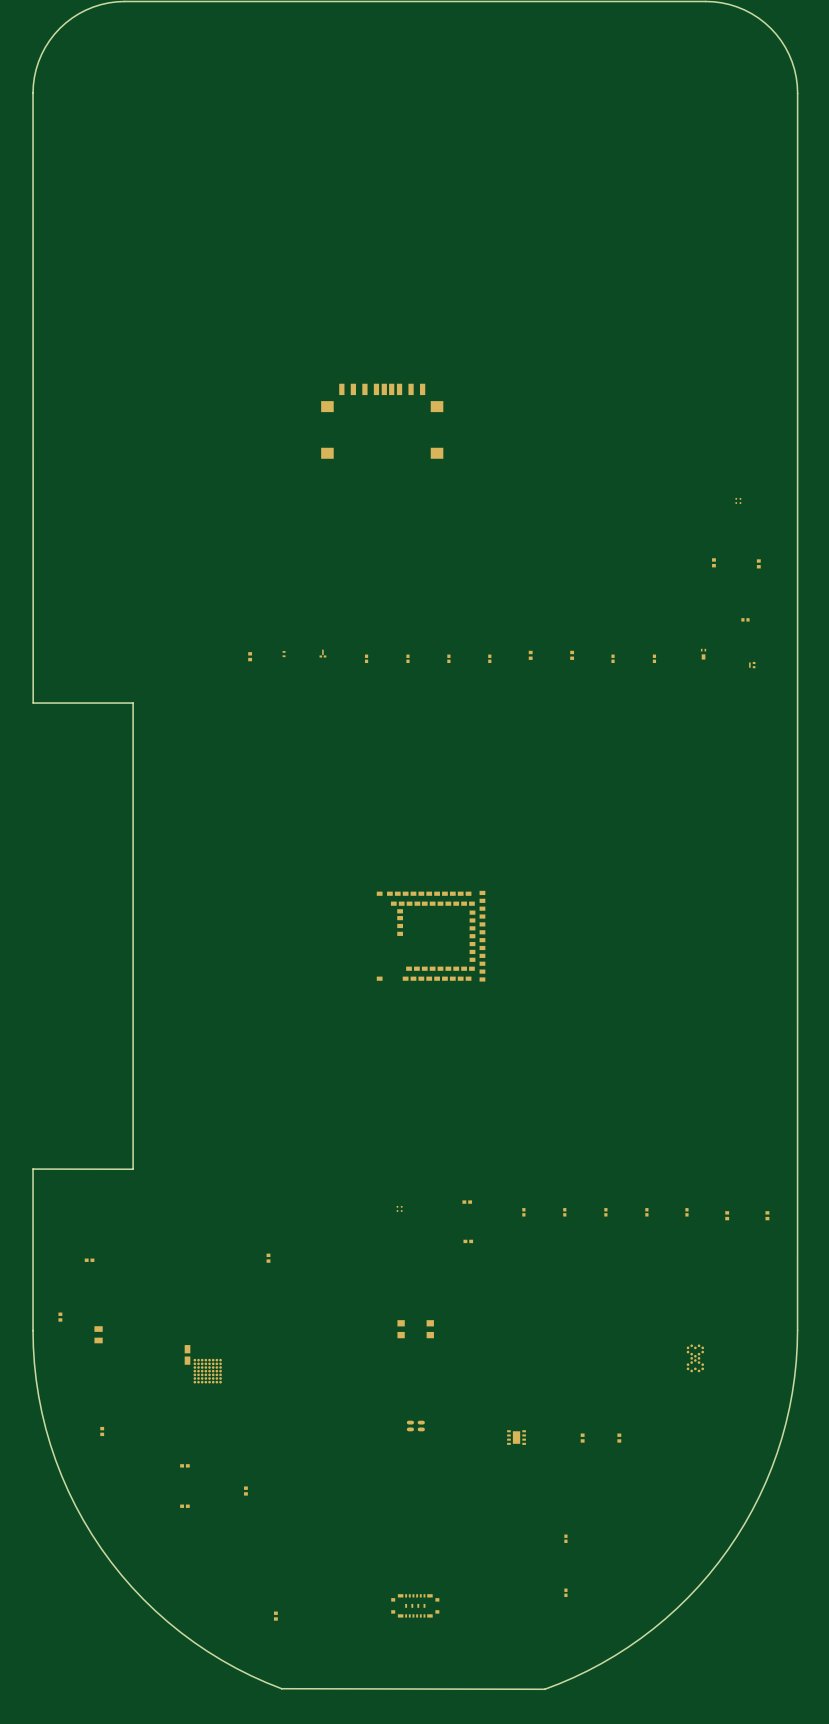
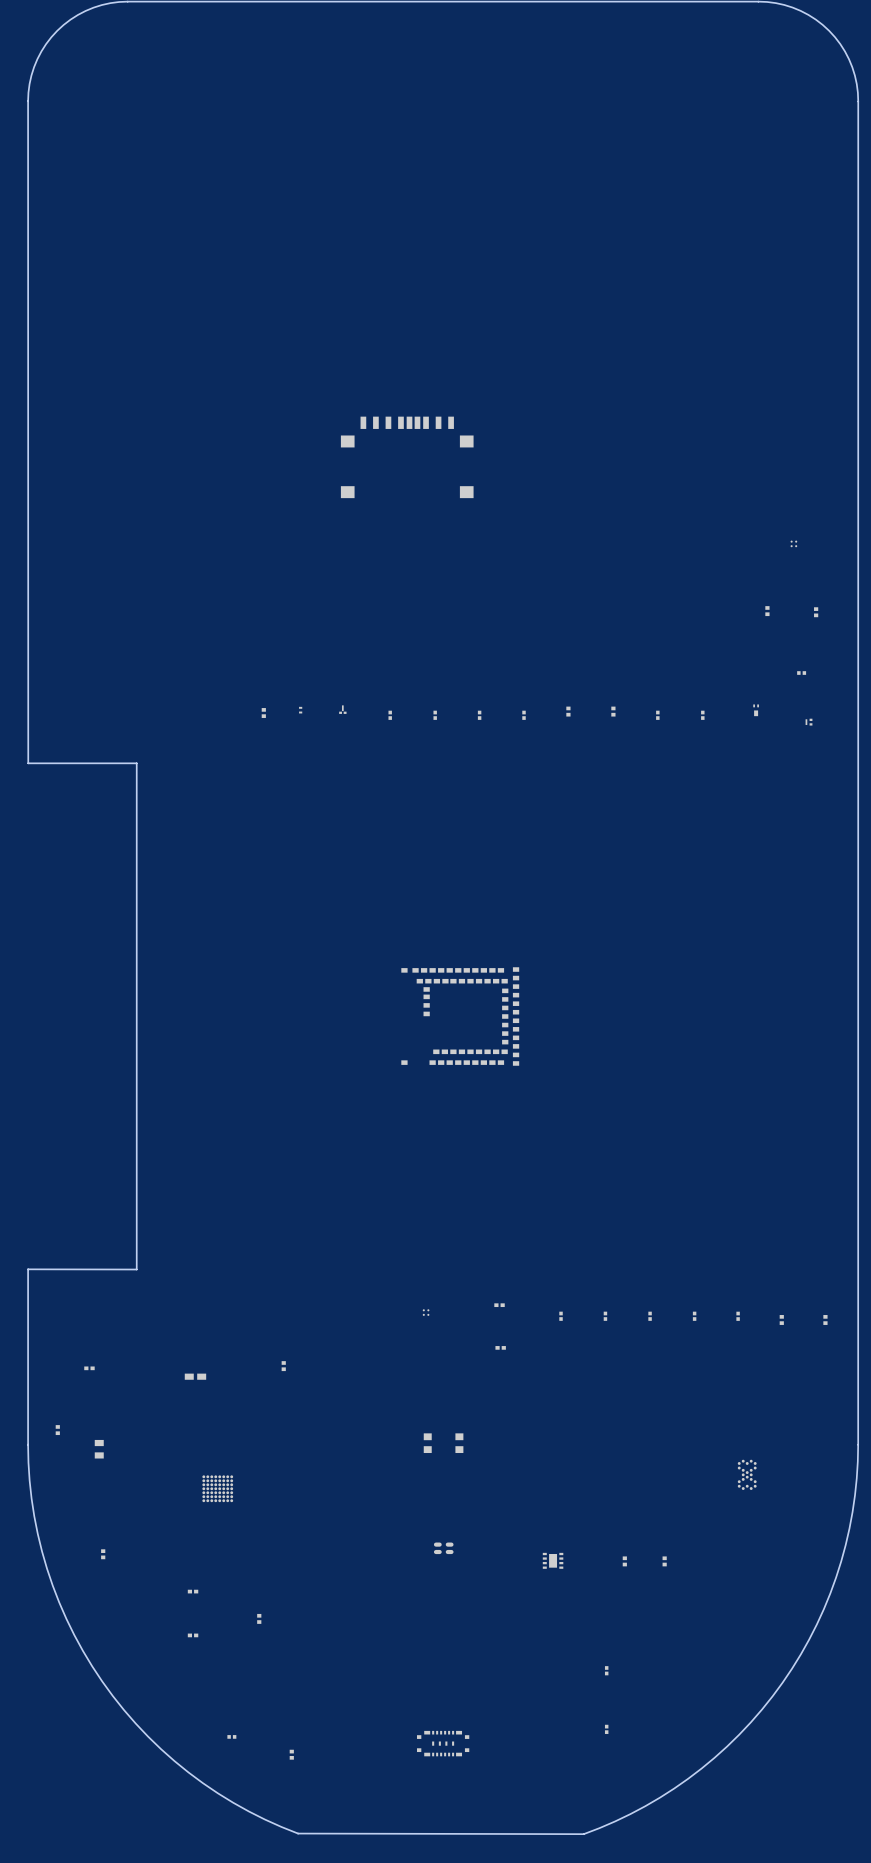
part rotation: 0° (187, 1354) -> 90° clockwise (195, 1376)
part position: (187, 1354) -> (195, 1376)
part: none -> (231, 1736)

